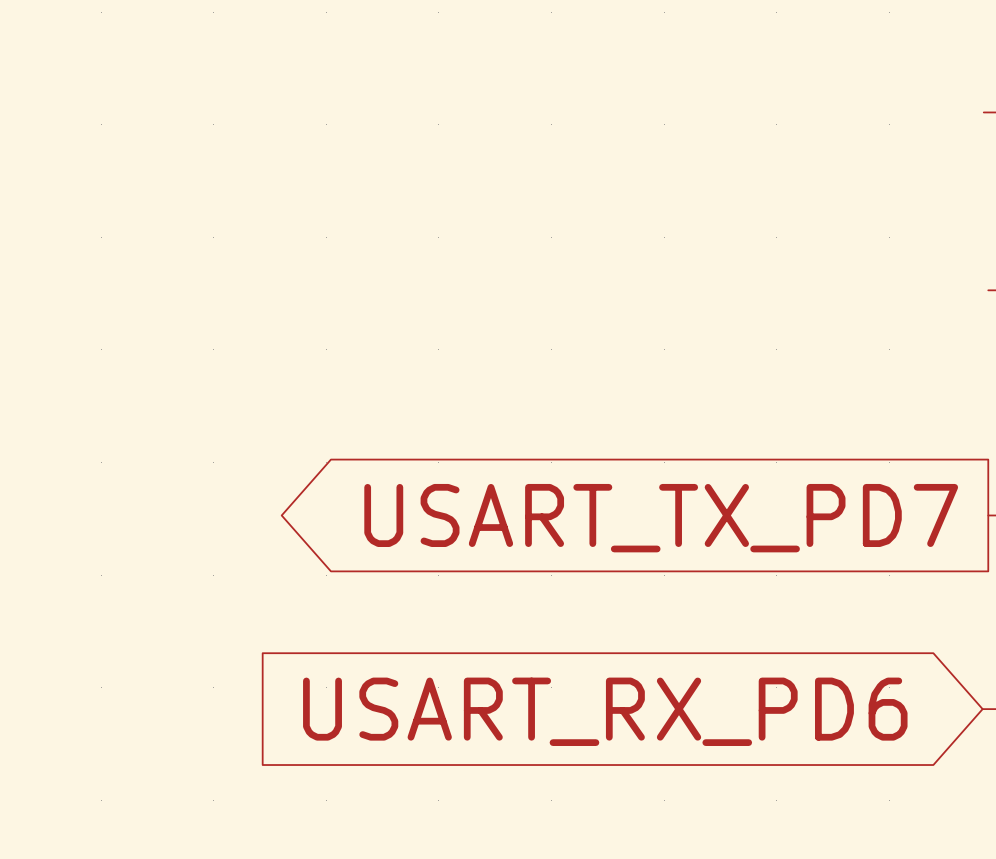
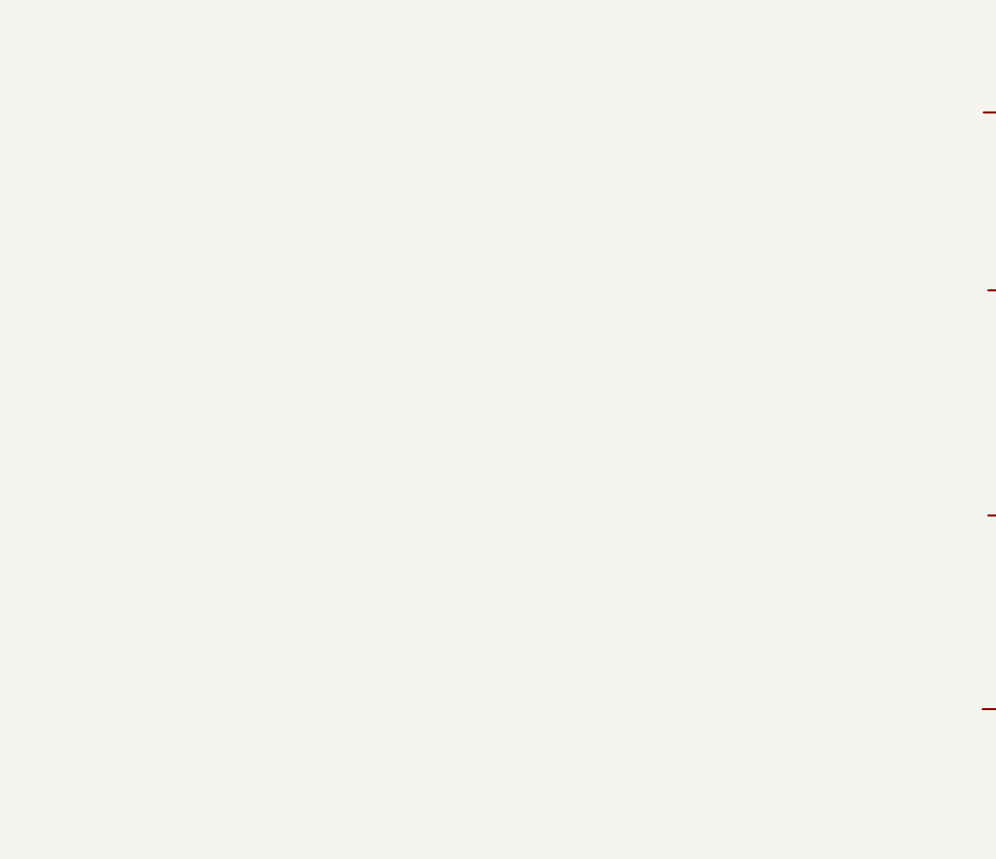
global label: USART_TX_PD7 (661, 518) -> none
global label: USART_RX_PD6 (605, 711) -> none

